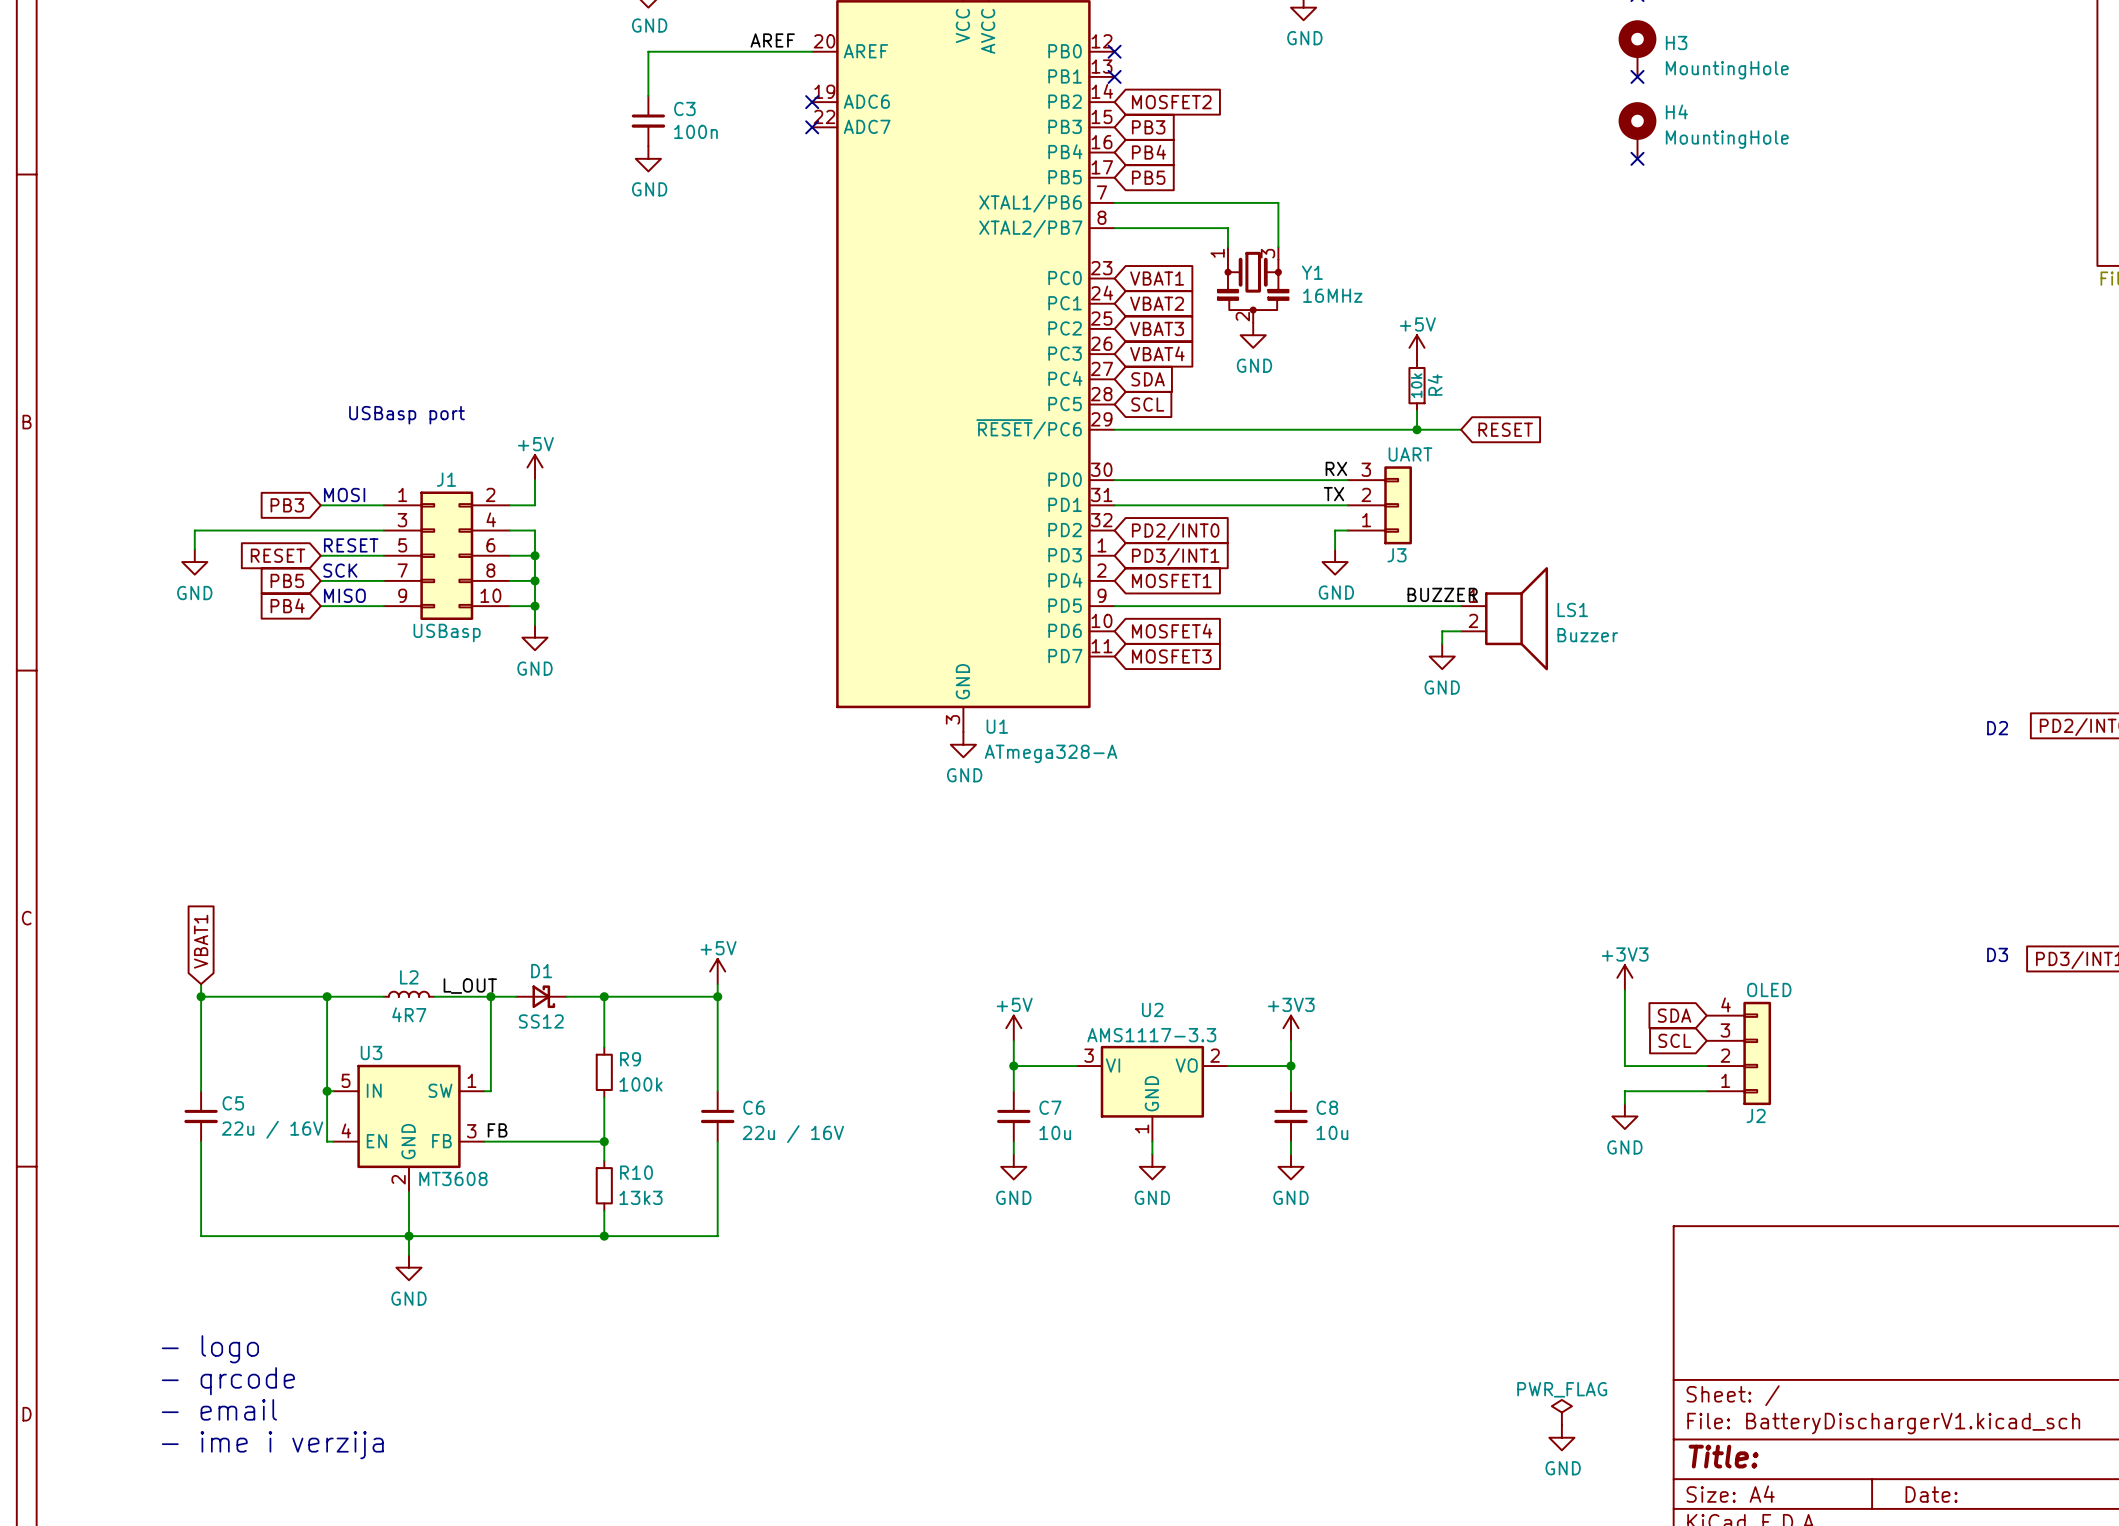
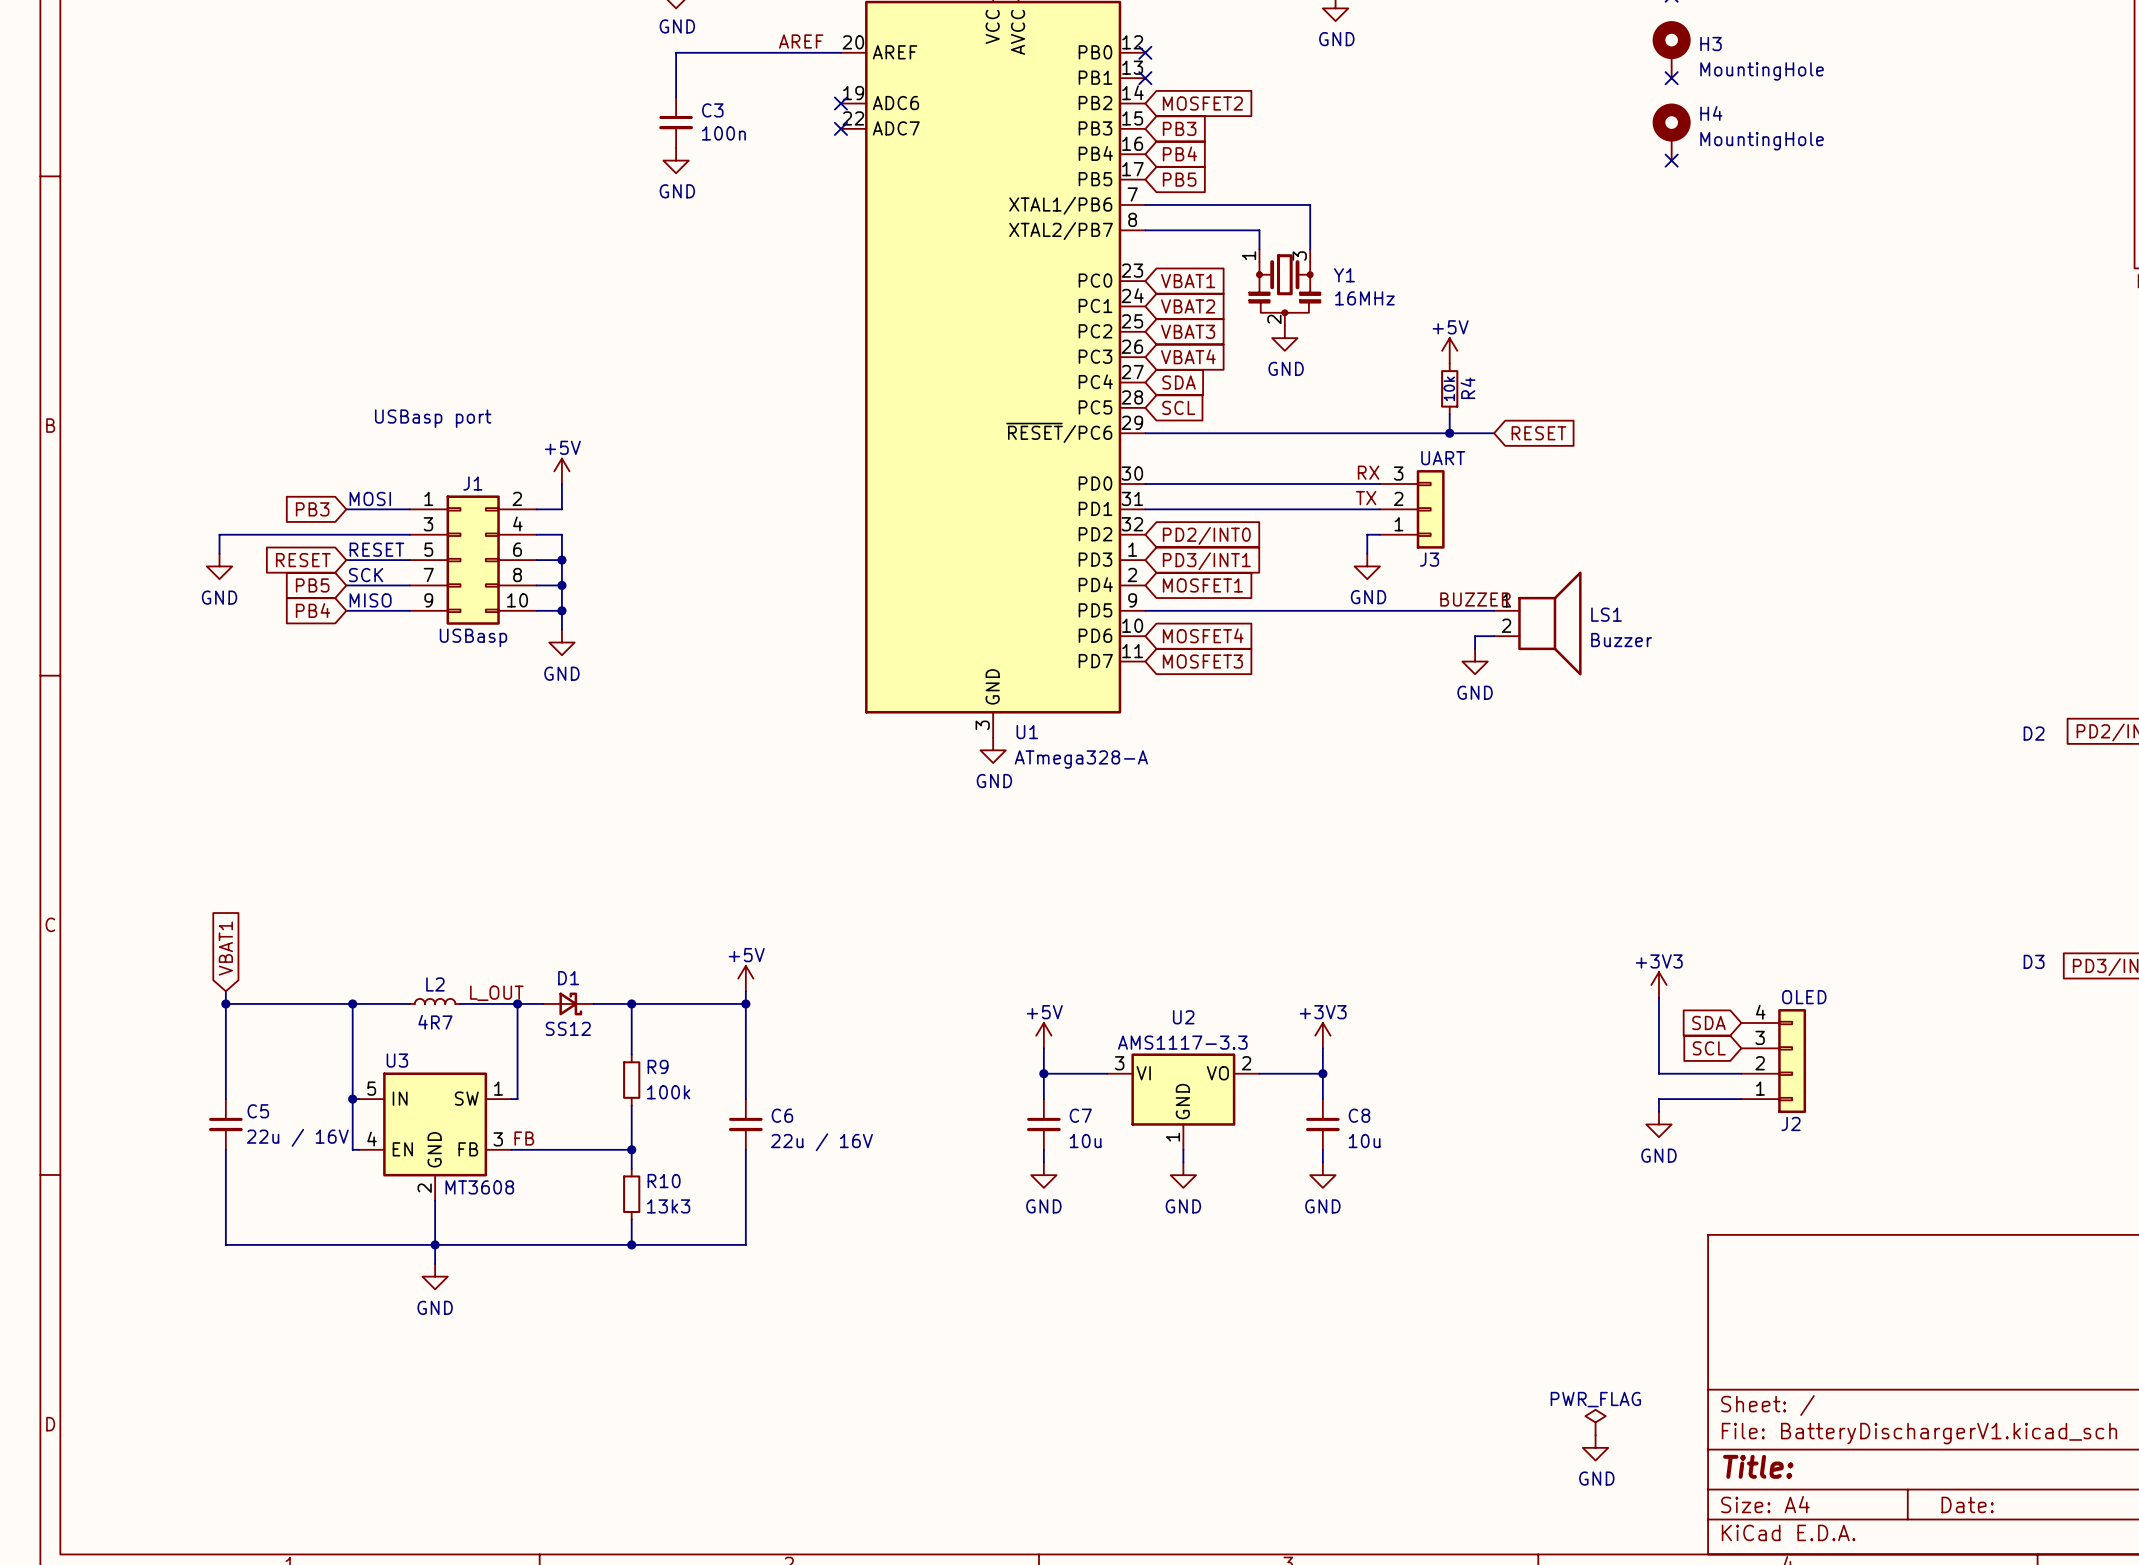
text: - logo (210, 1349) -> none
text: - qrcode (228, 1381) -> none
text: - email (219, 1409) -> none
text: - ime i verzija (272, 1445) -> none

